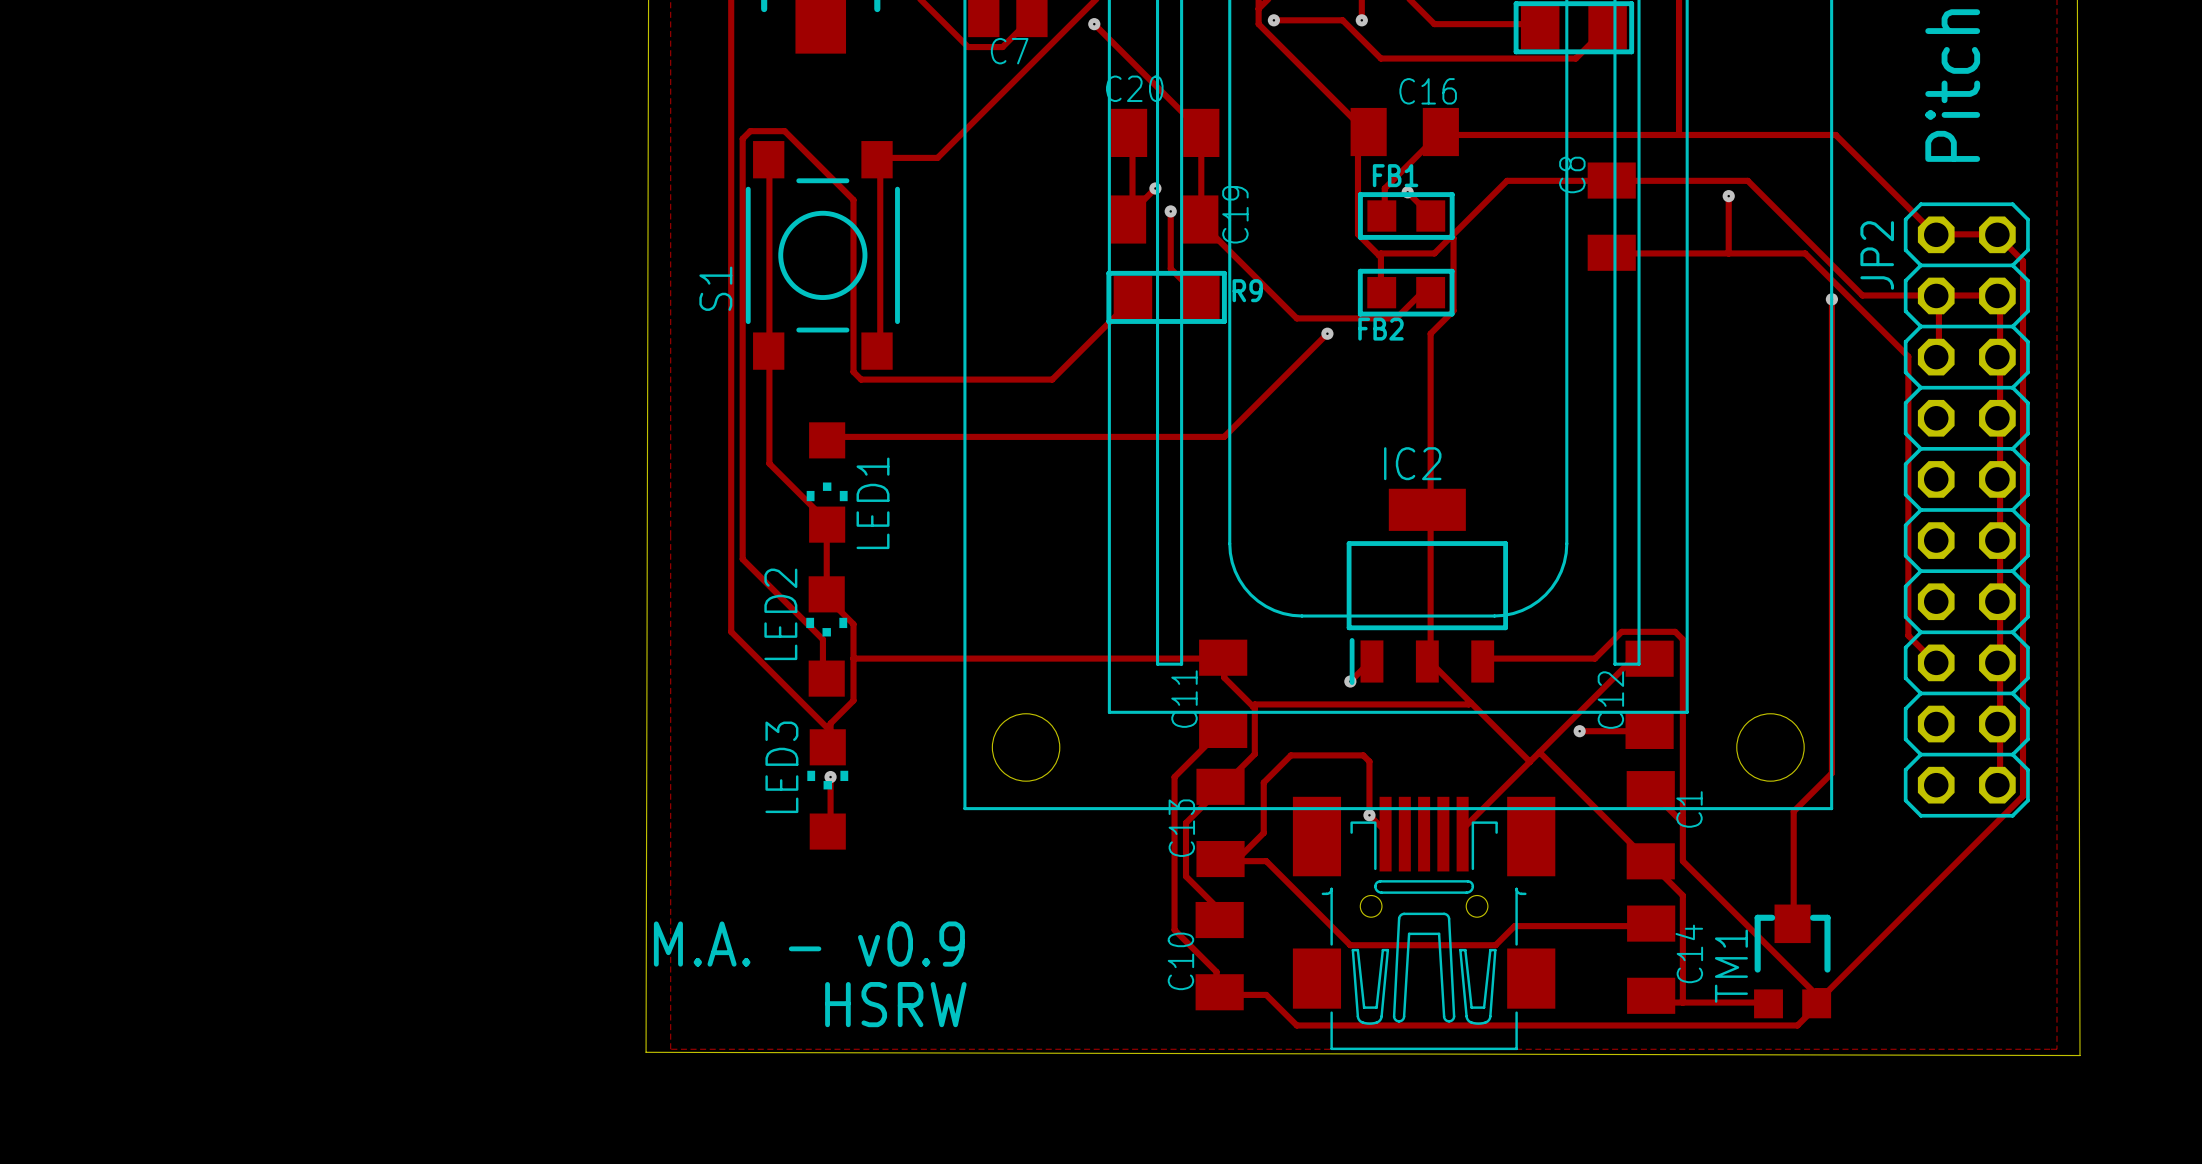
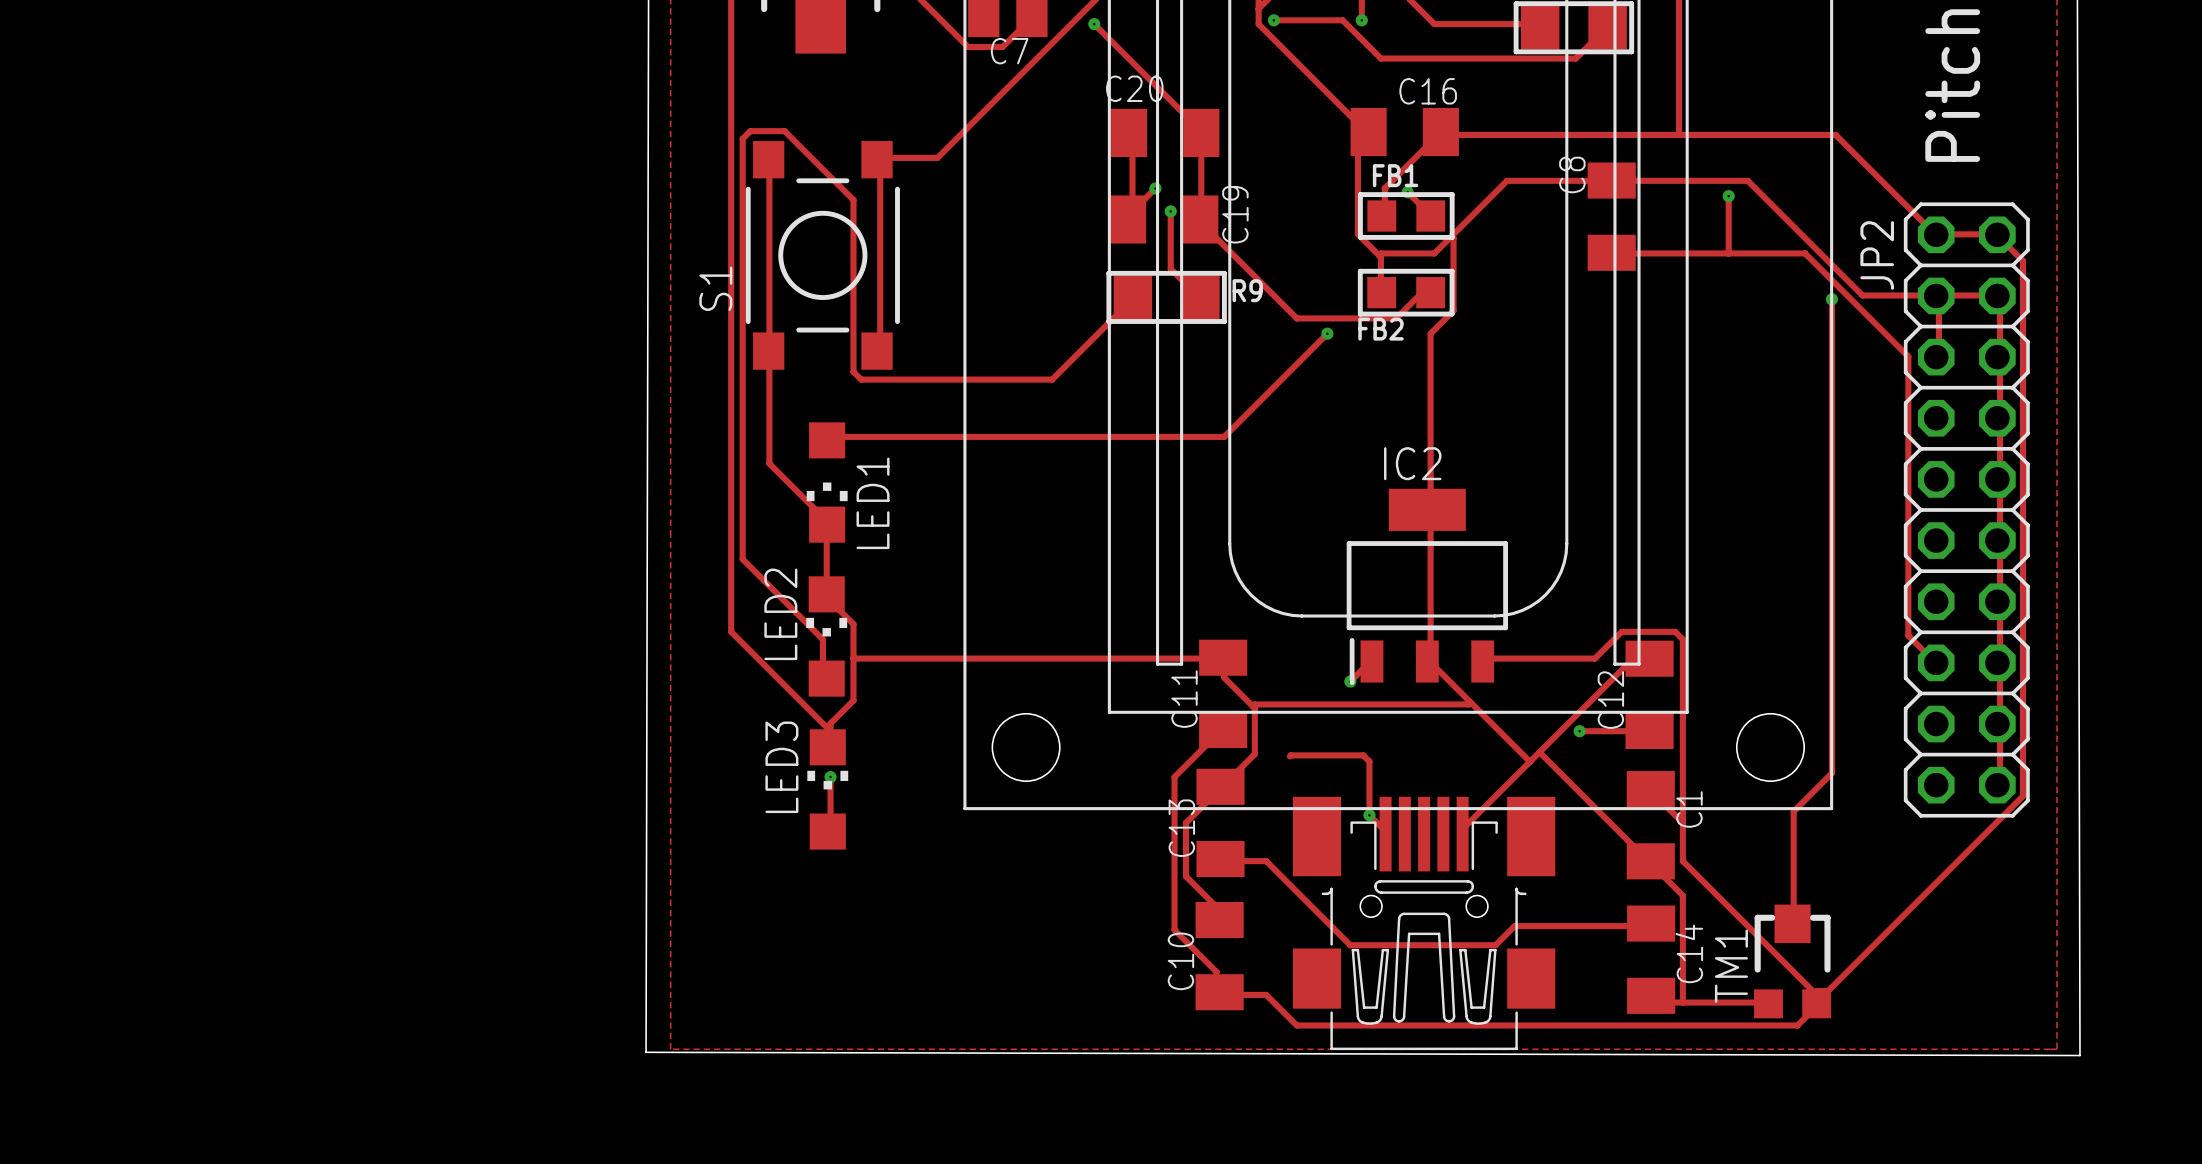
track: (1289, 756) (1263, 782) (1263, 833) (1237, 859) (1220, 859) -> none
text: M.A. - v0.9 (809, 944) -> none
text: HSRW (895, 1004) -> none

